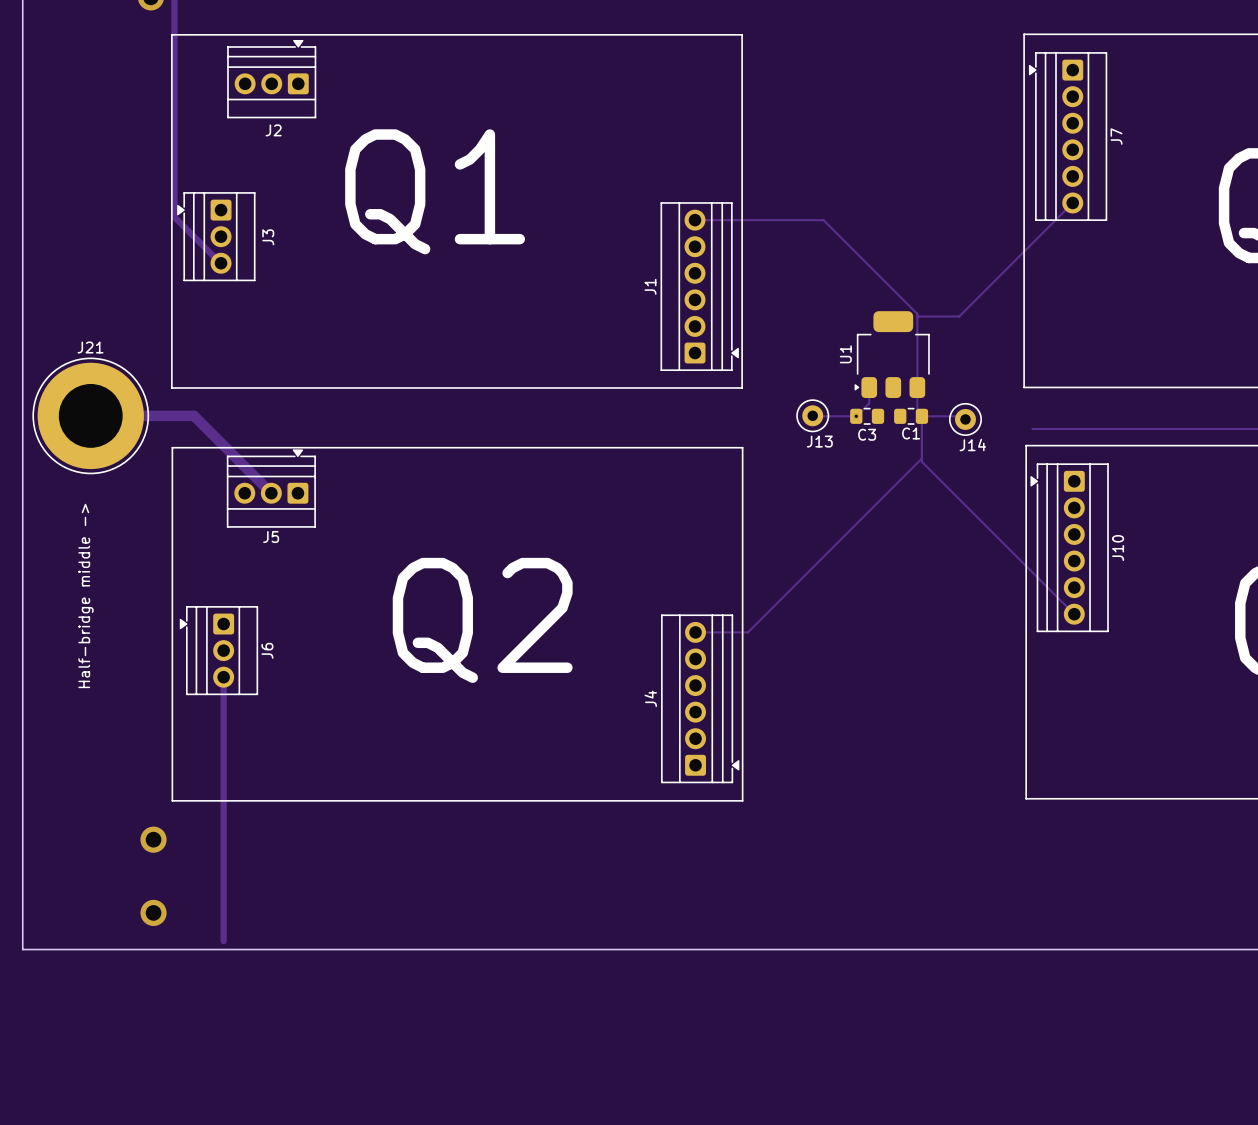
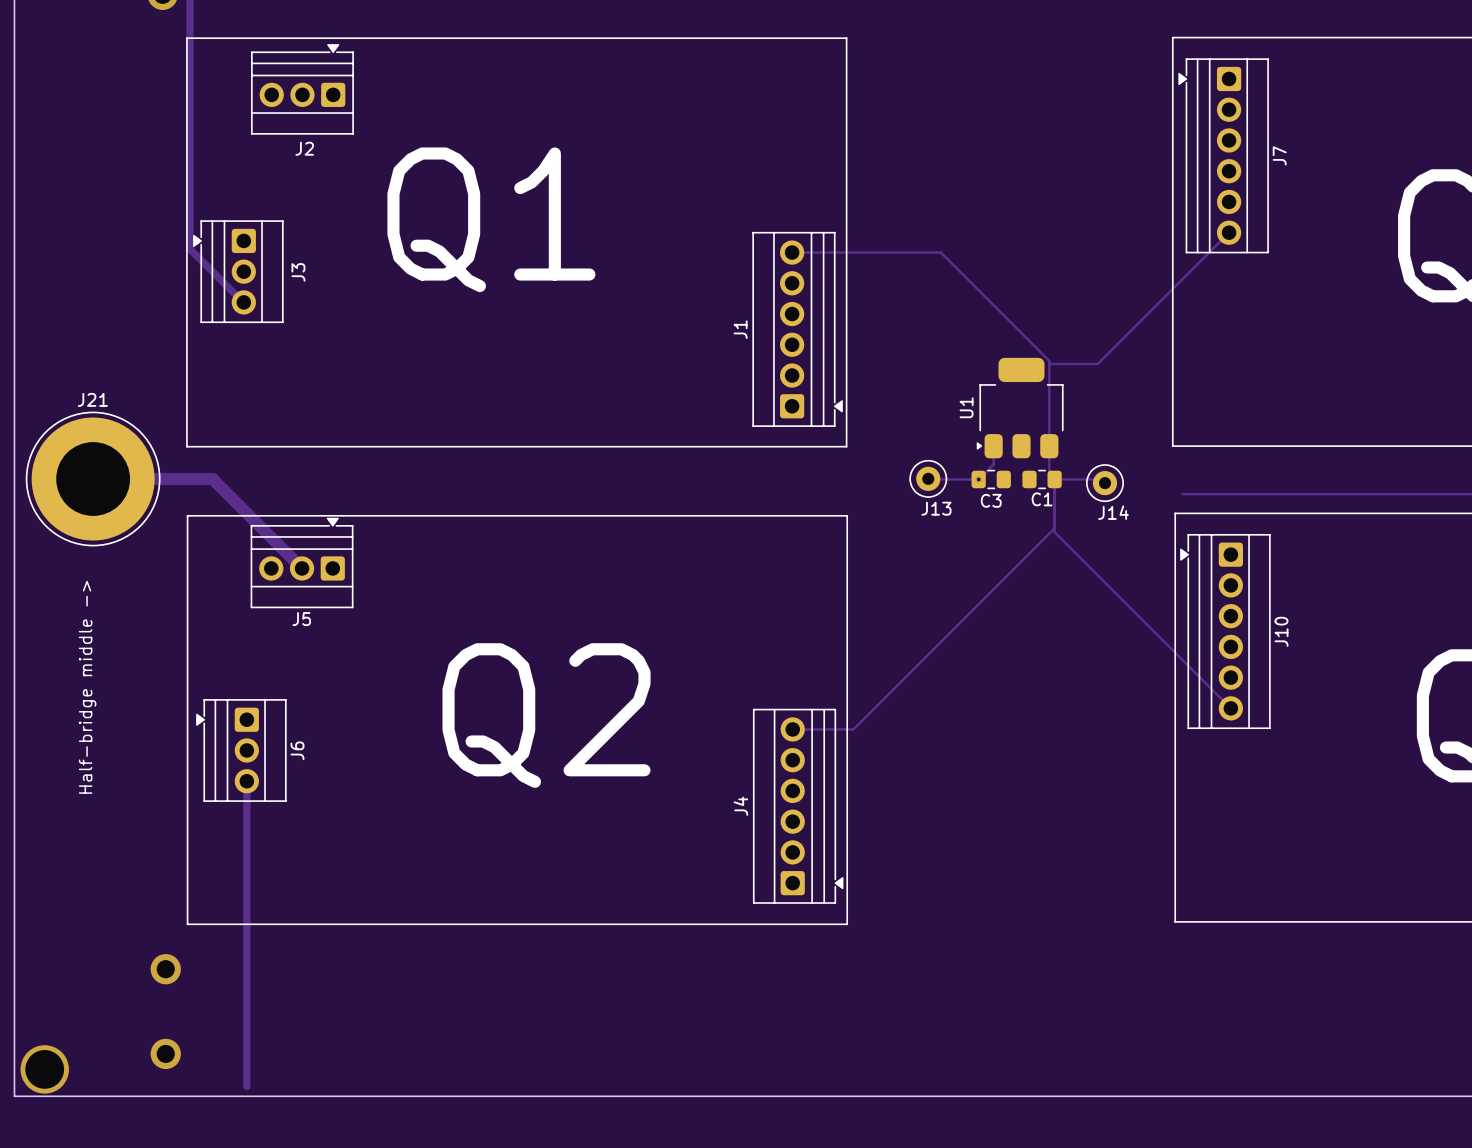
via: none -> (44, 1069)

